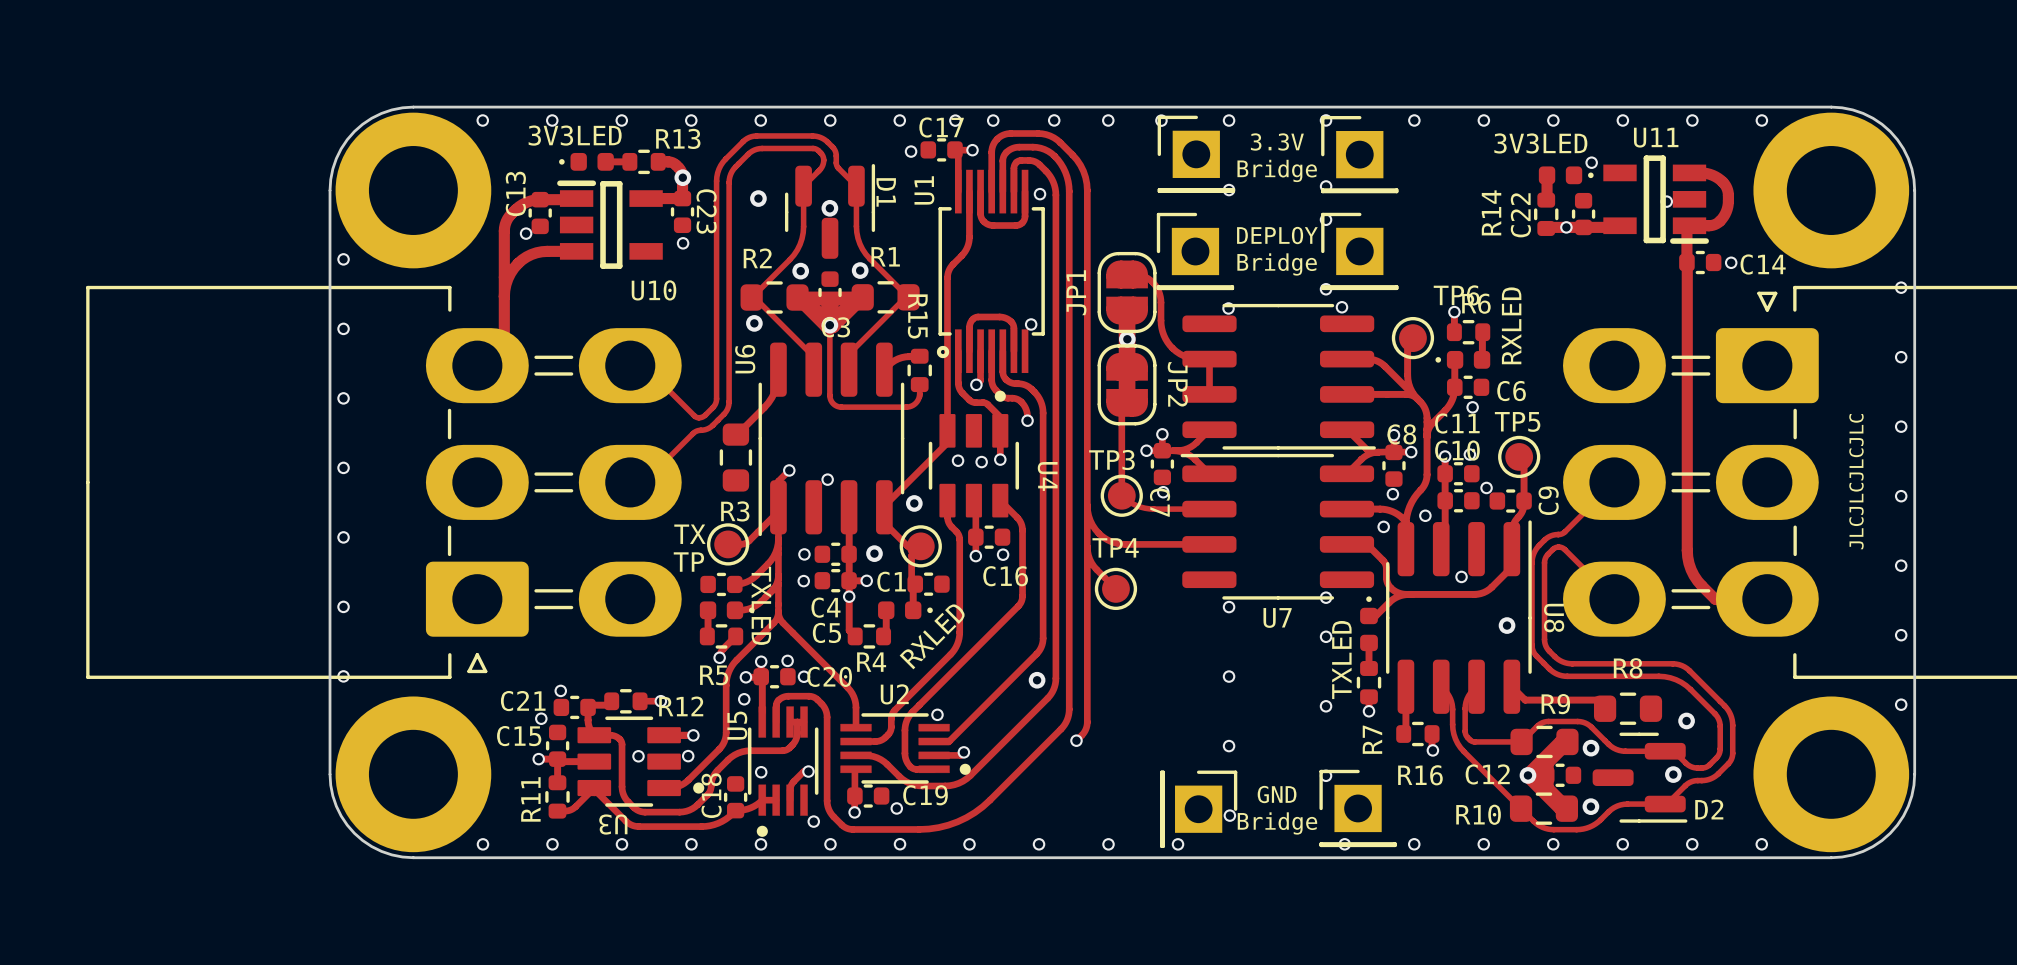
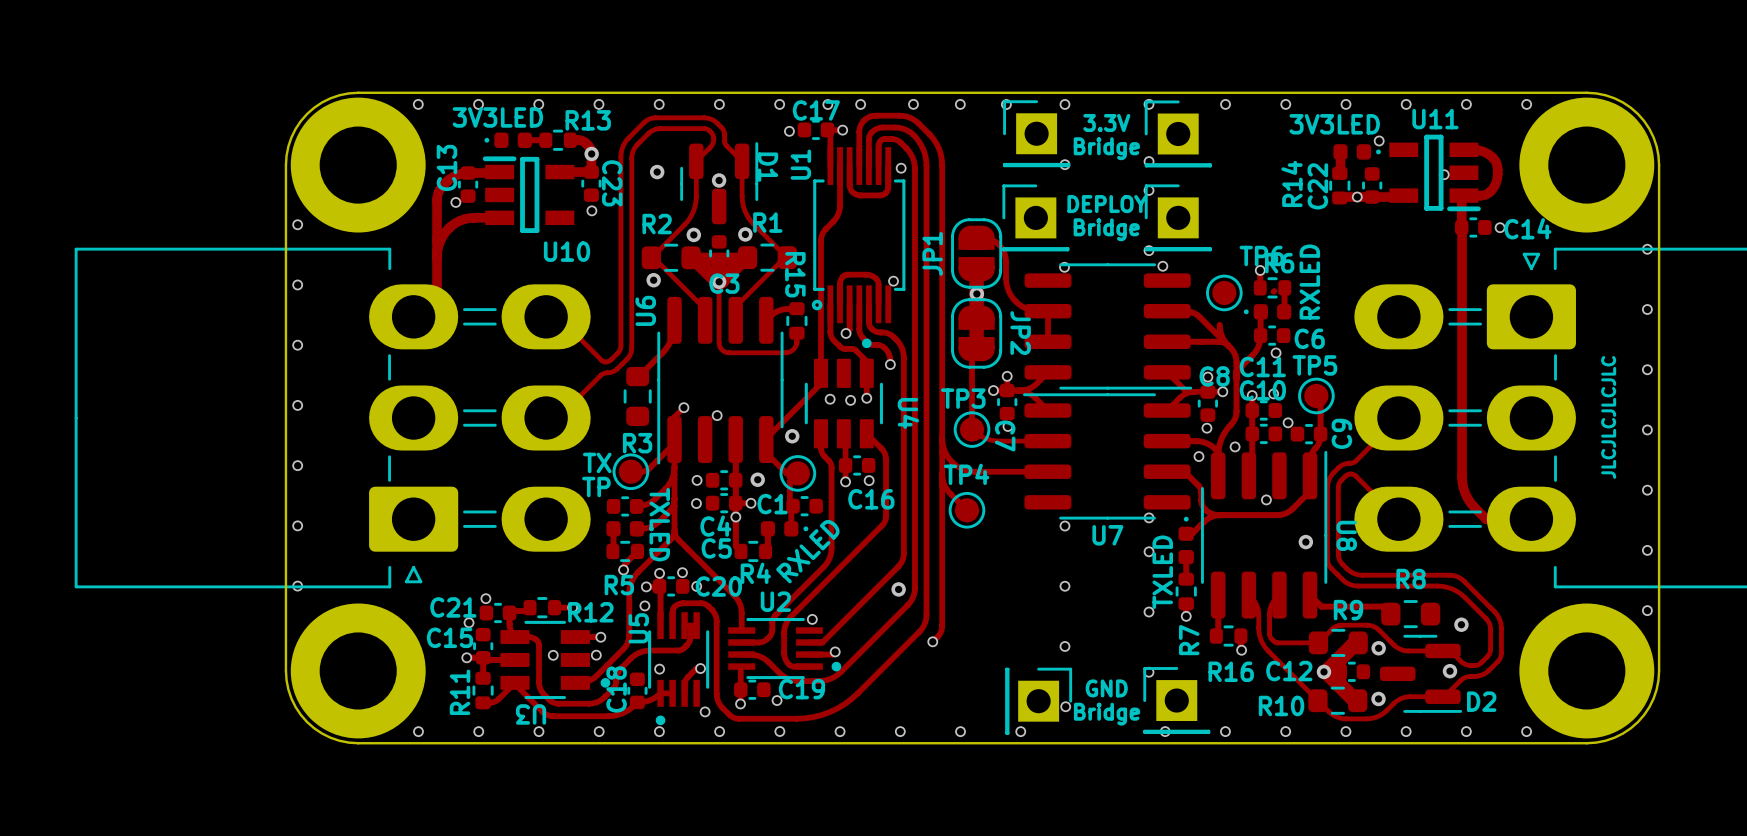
track: none -> (1274, 291) (1273, 291)
track: (1412, 338) (1407, 343) (1407, 375) -> none

